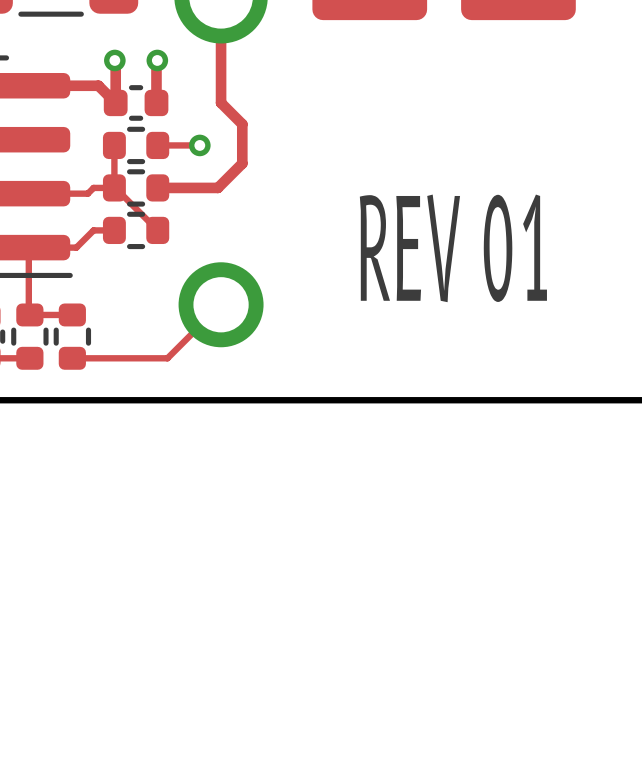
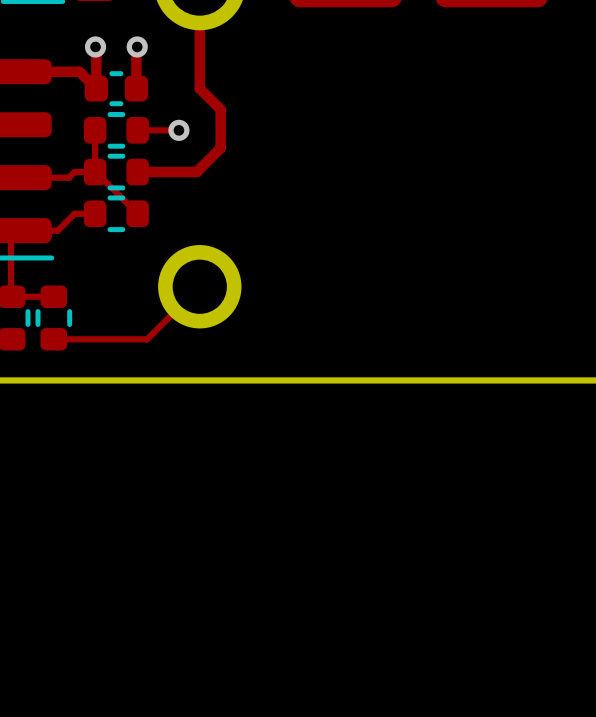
text: REV 01 (453, 248) -> none

